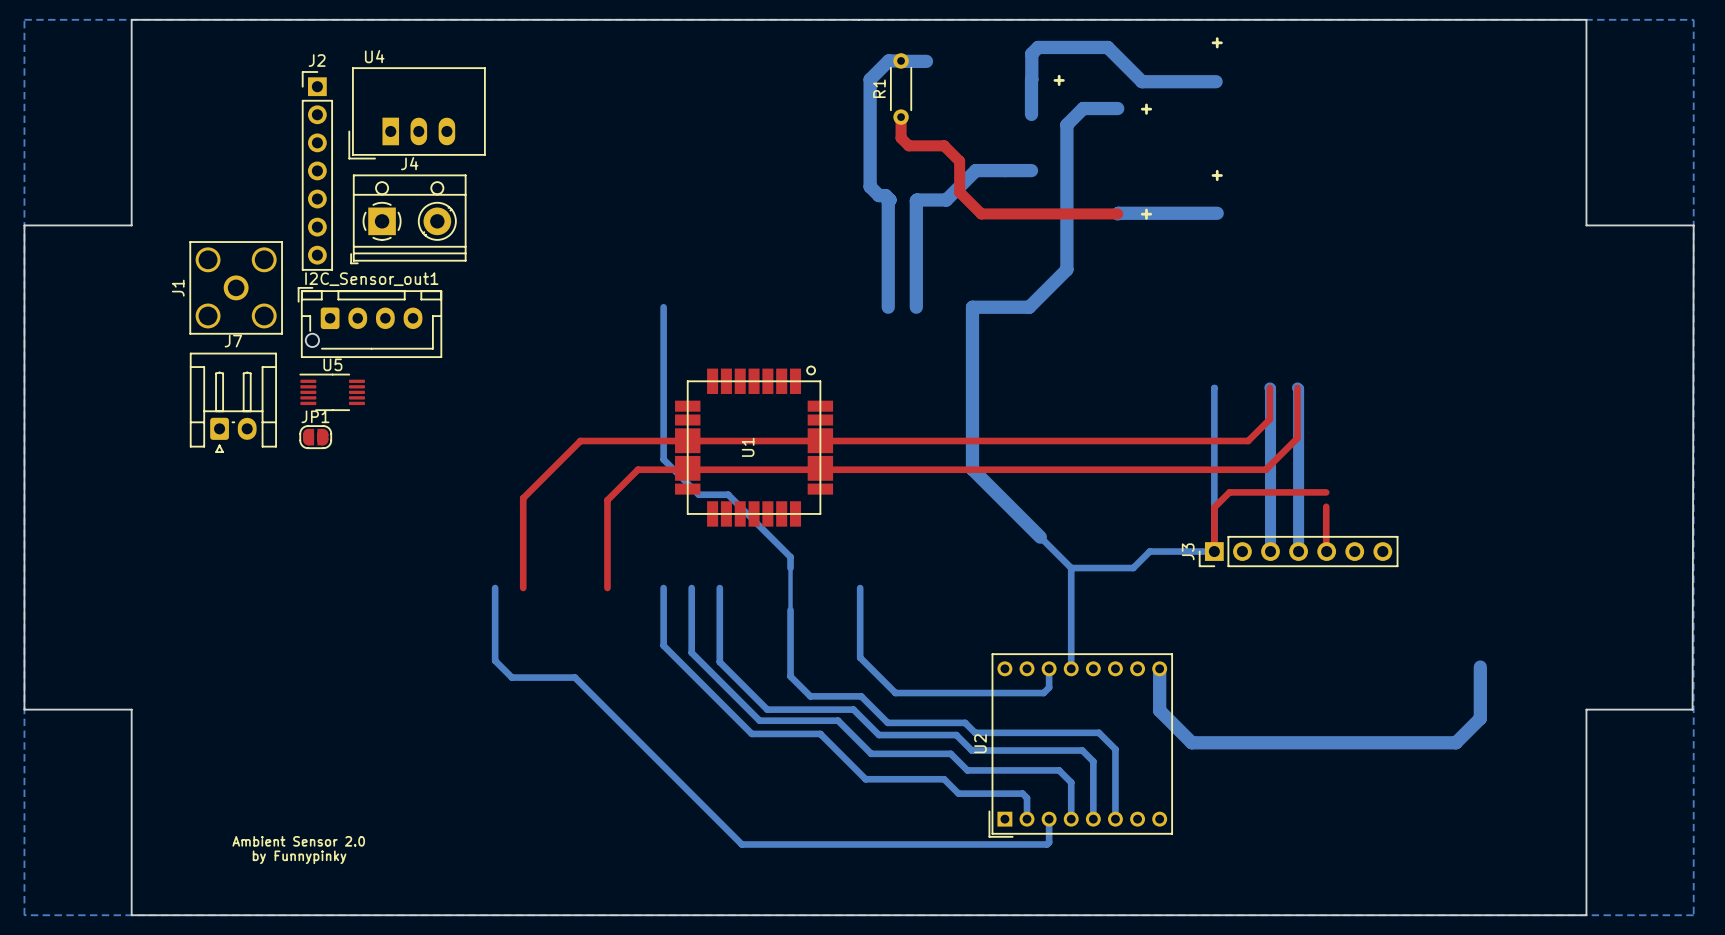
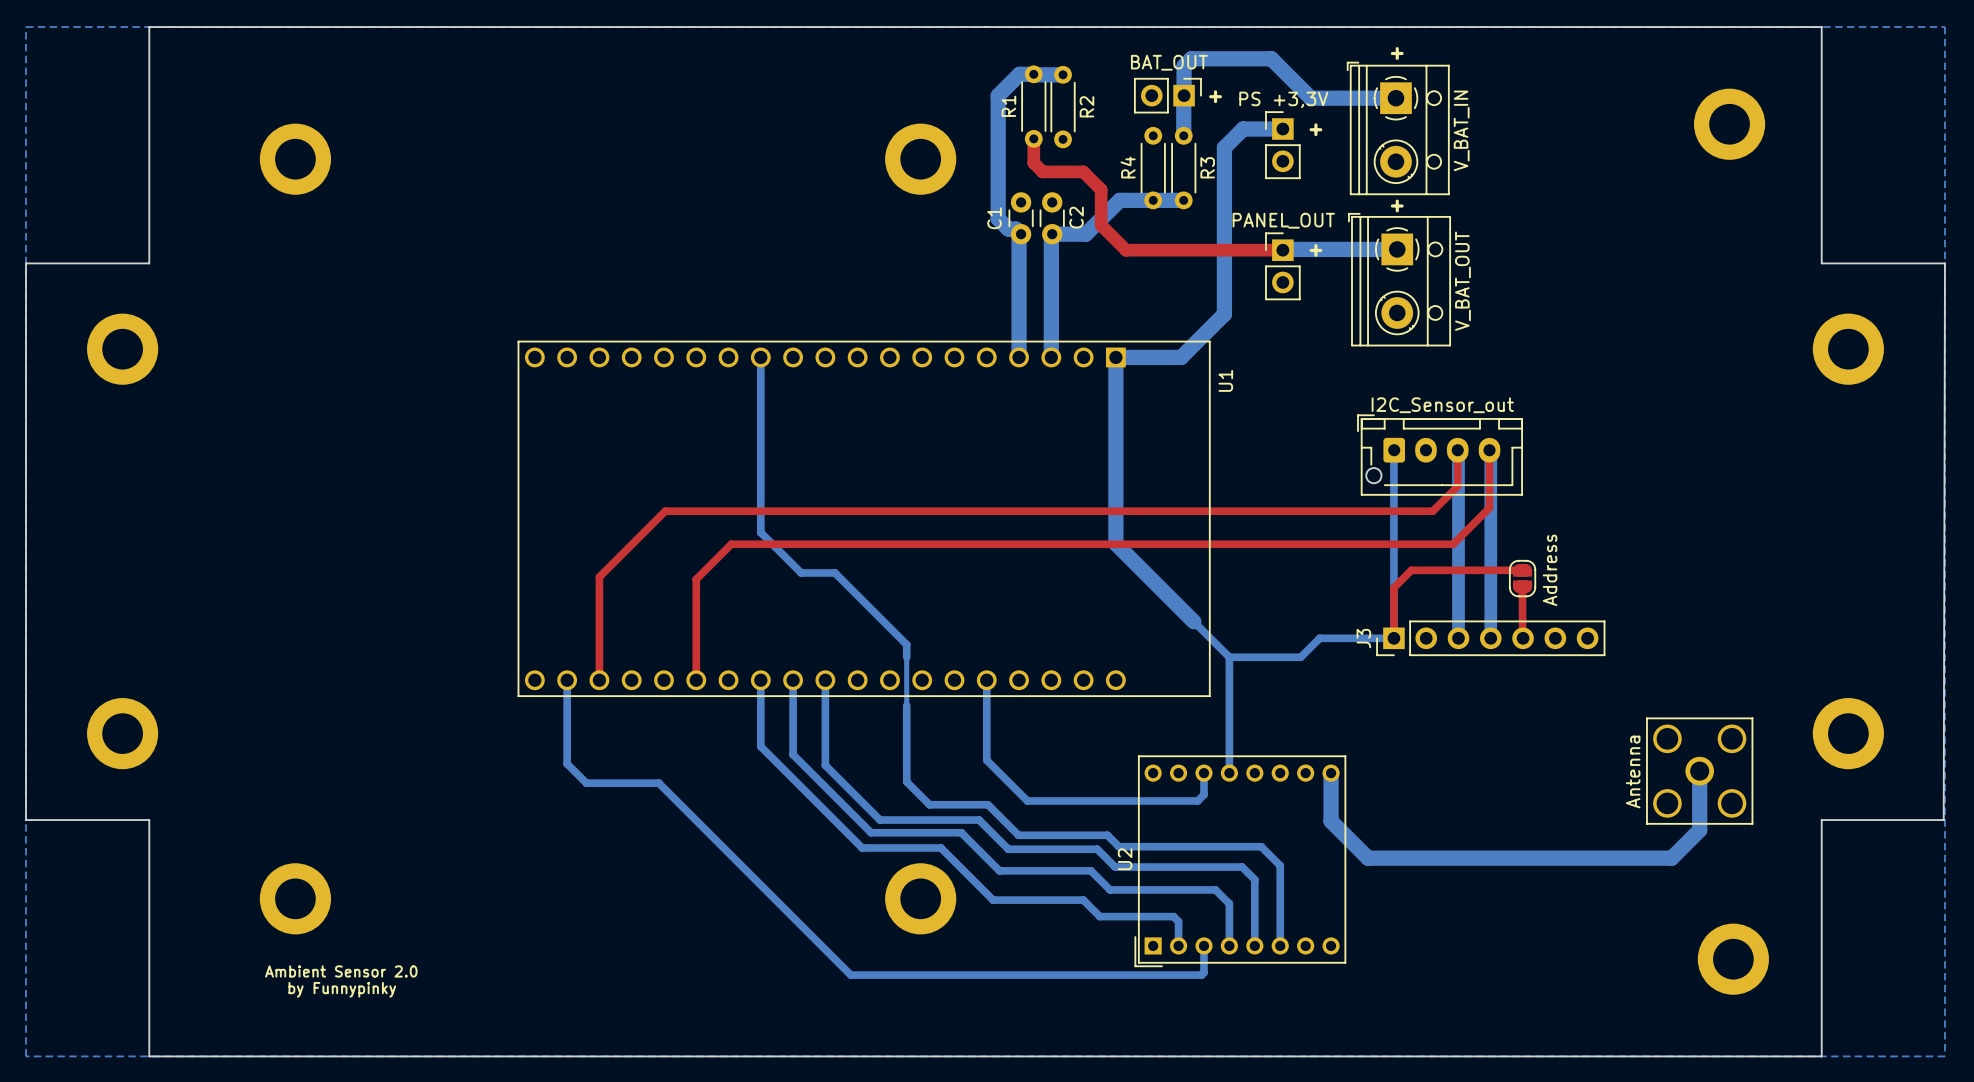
BAT_OUT: none -> (1167, 95)
R2: none -> (1063, 107)
part: none -> (1729, 124)
V_BAT_IN: none -> (1398, 128)
U4: (417, 113) -> none
PS +3,3V: none -> (1282, 145)
part: none -> (295, 159)
part: none -> (920, 159)
R4: none -> (1153, 168)
R3: none -> (1183, 168)
J2: (317, 170) -> none
C1: none -> (1021, 218)
C2: none -> (1052, 218)
J4: (408, 219) -> none
PANEL_OUT: none -> (1282, 266)
V_BAT_OUT: none -> (1399, 279)
J1: (236, 287) -> none
part: none -> (122, 349)
part: none -> (1848, 349)
I2C_Sensor_out1: (369, 322) -> none
U1 footprint: [675, 365, 834, 527] -> [517, 340, 1211, 697]
U5: (332, 392) -> none
I2C_Sensor_out: none -> (1440, 455)
J7: (233, 402) -> none
JP1: (315, 437) -> none
U1 name position: U1 (748, 447) -> U1 (1225, 380)
Address: none -> (1522, 578)
part: none -> (122, 733)
part: none -> (1848, 733)
Antenna: none -> (1699, 771)
part: none -> (295, 898)
part: none -> (920, 898)
part: none -> (1733, 959)

